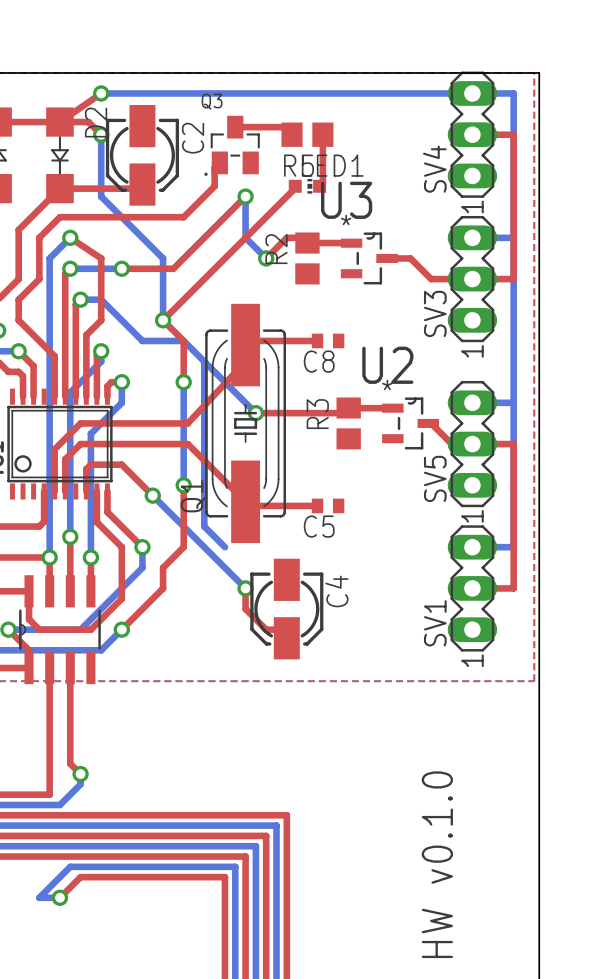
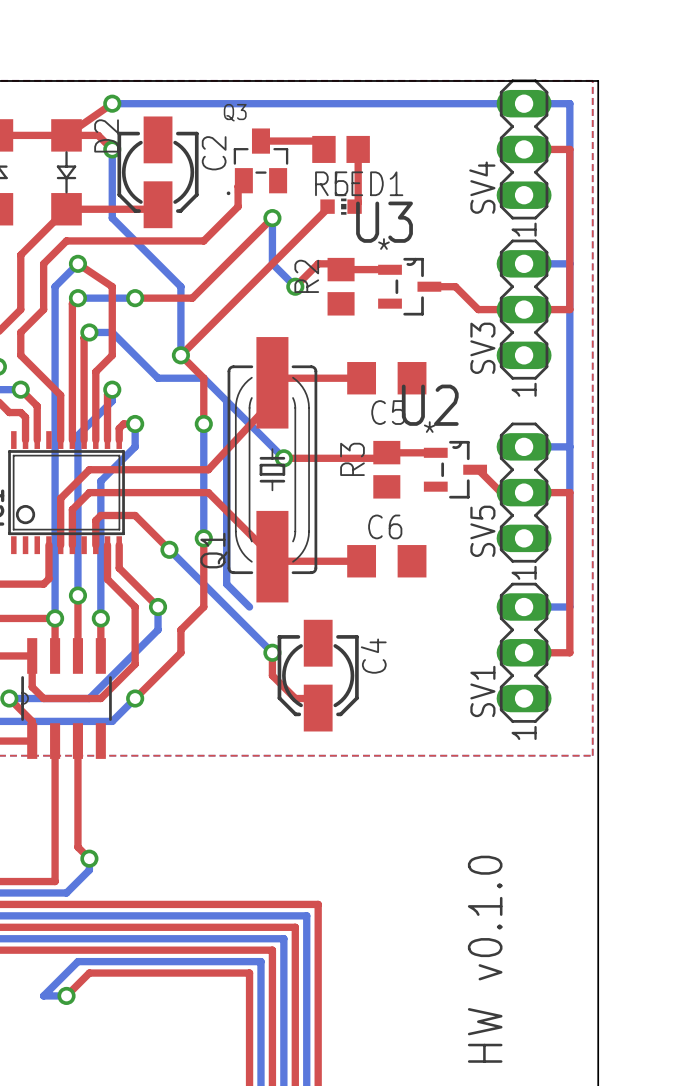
C8: (328, 340) -> none
C5 footprint: [311, 498, 345, 514] -> [347, 362, 427, 395]
C6: none -> (386, 561)

